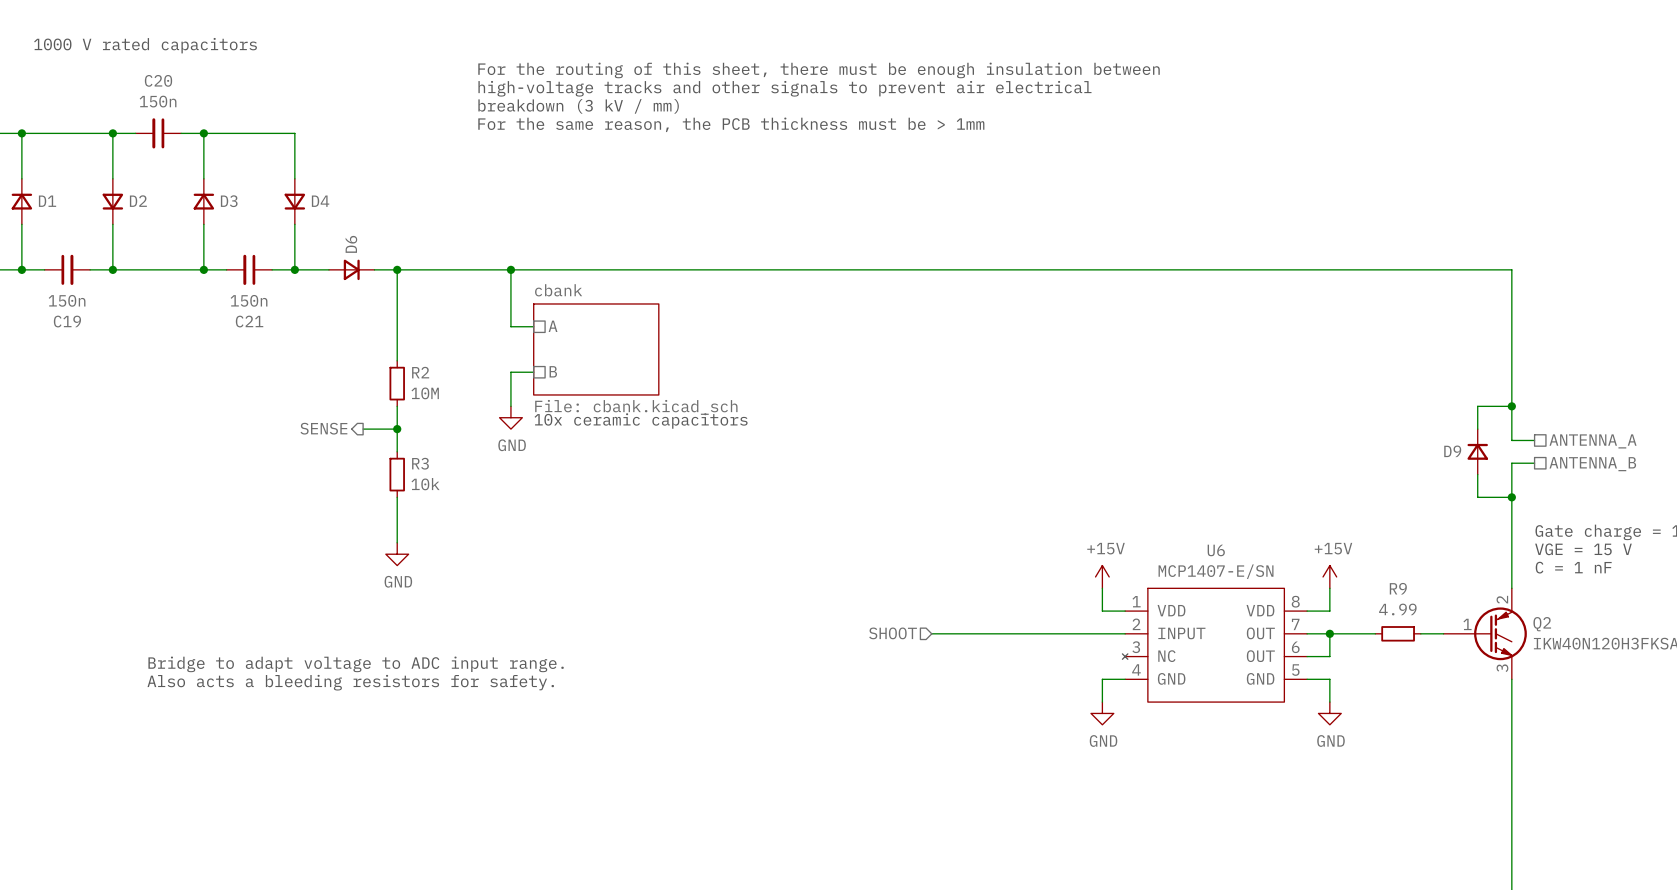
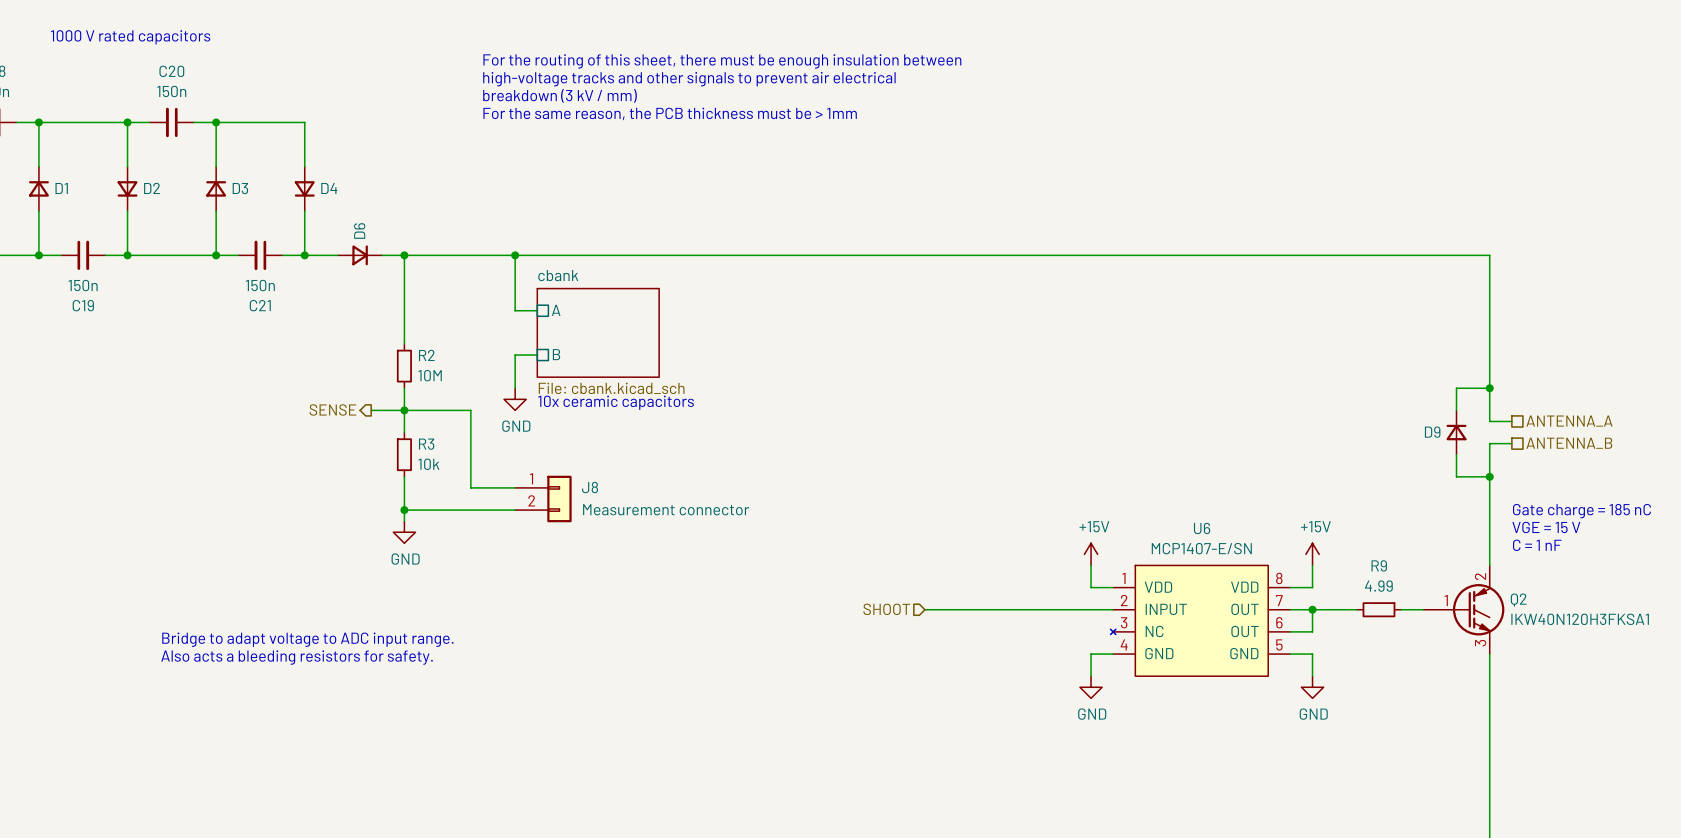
wire: none -> (404, 410) (470, 410) (470, 487) (515, 487)
J8: none -> Measurement connector (543, 499)
wire: none -> (404, 510) (515, 510)
junction: none -> (404, 510)

